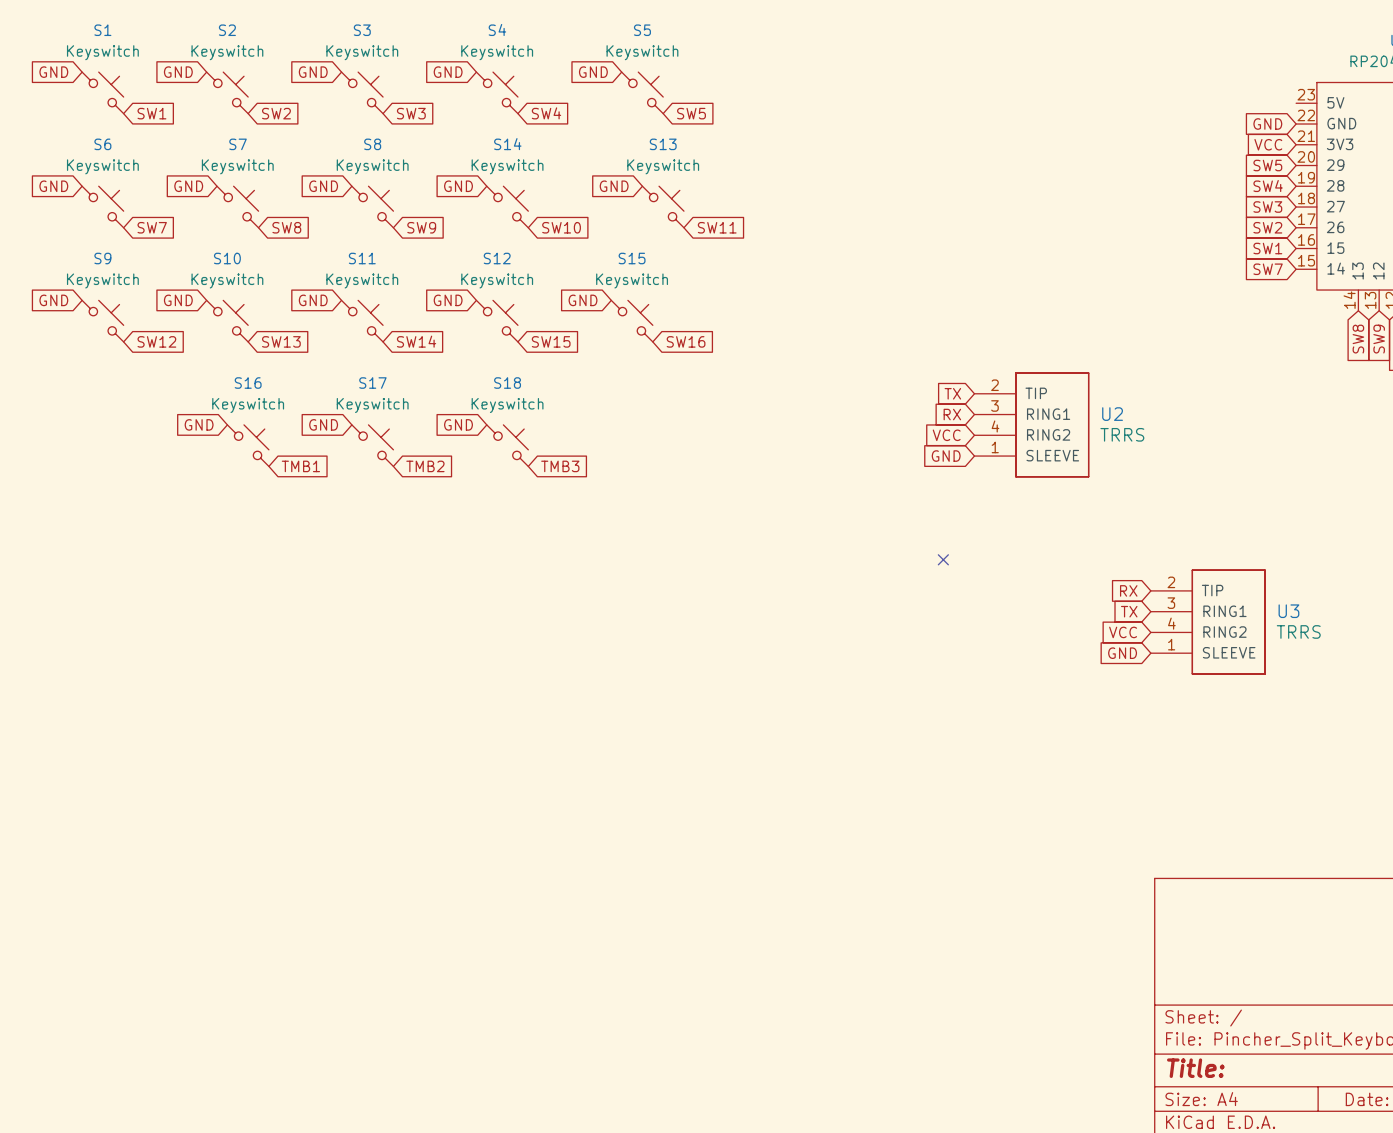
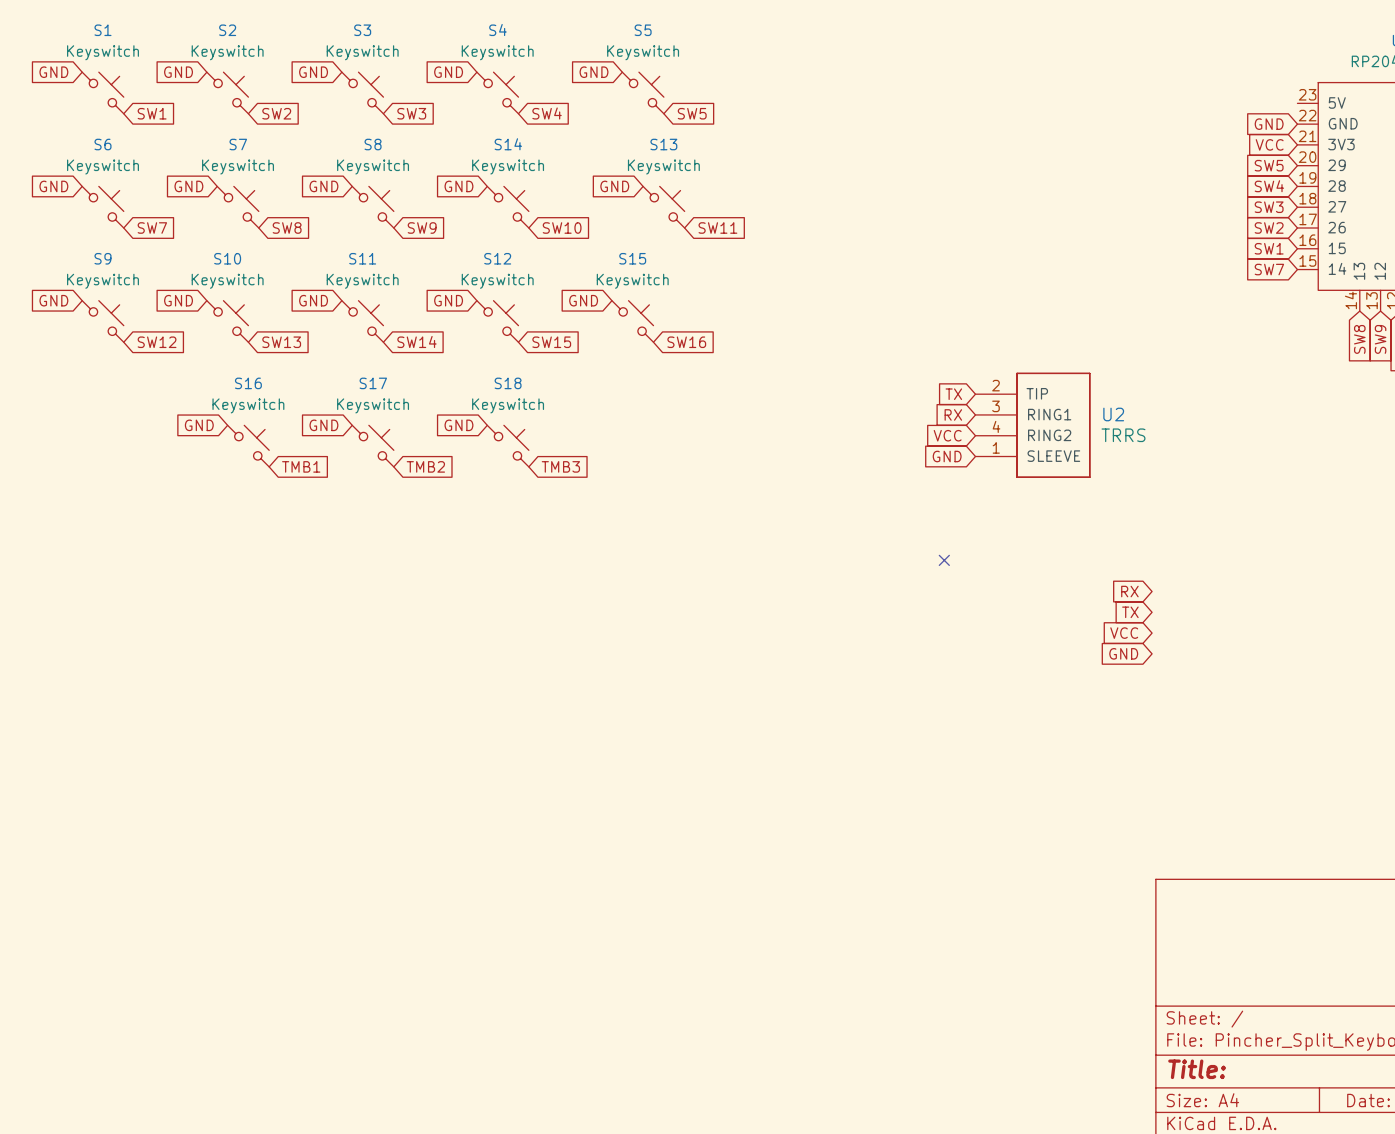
U3: TRRS (1207, 622) -> none

